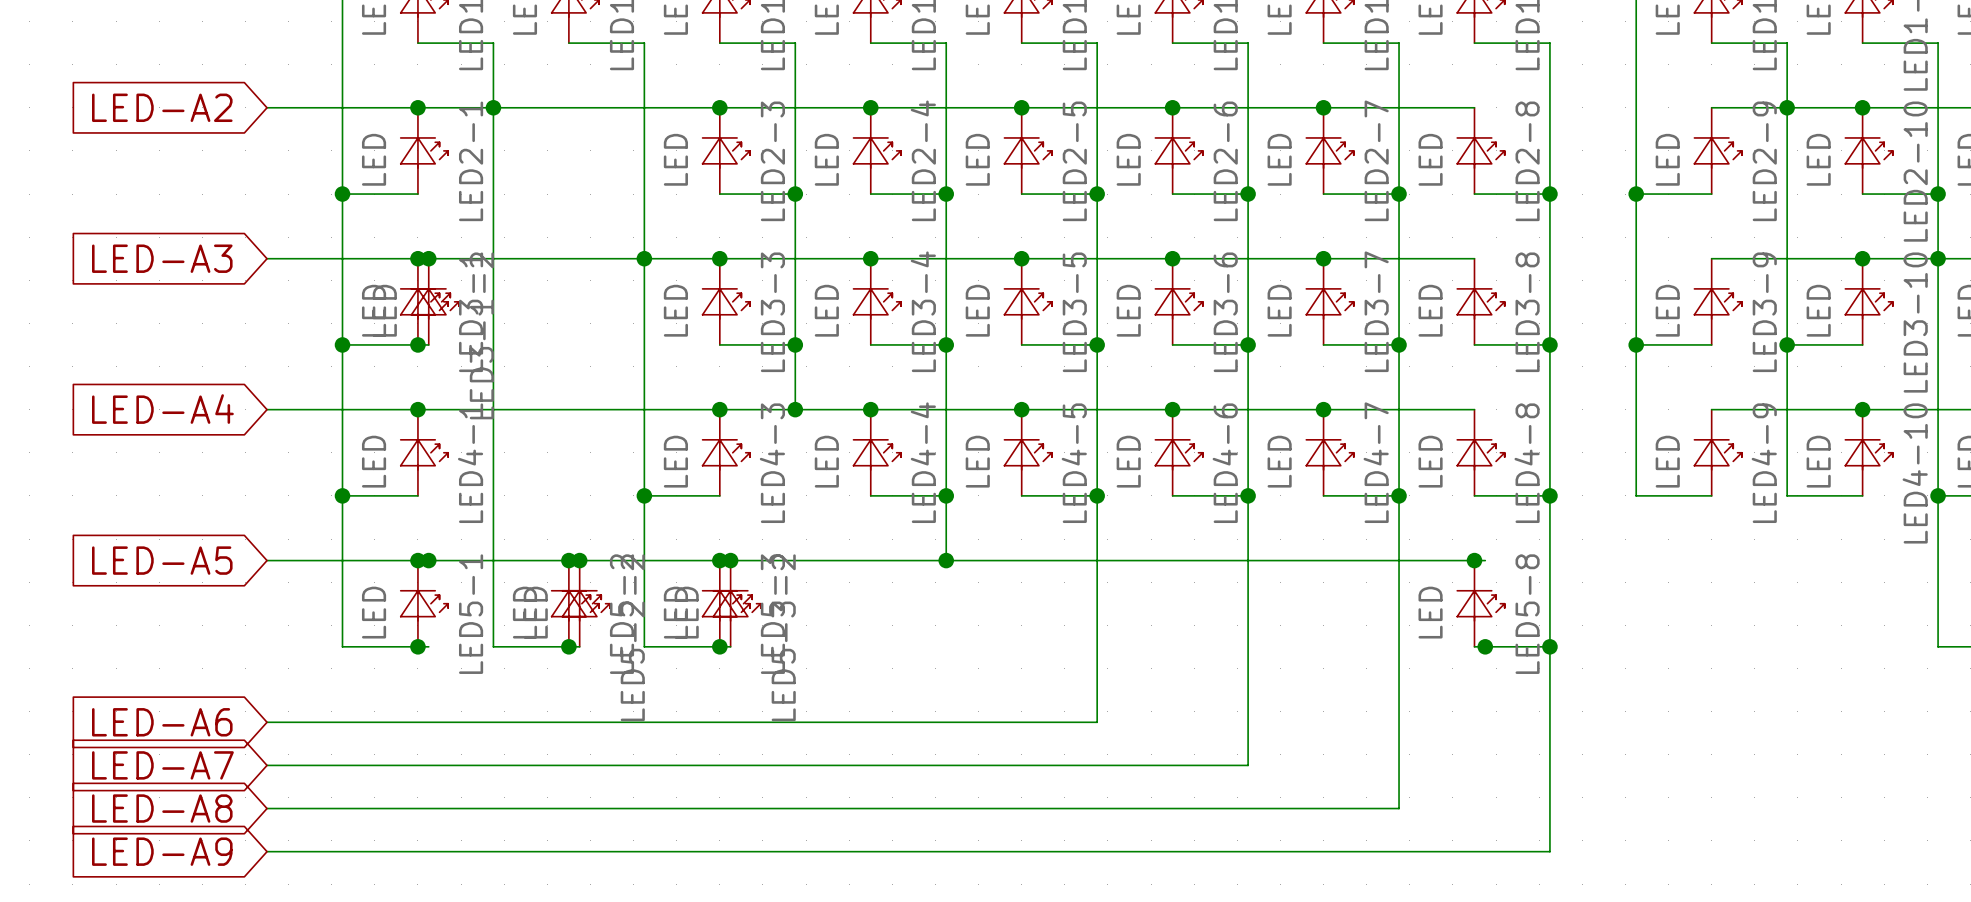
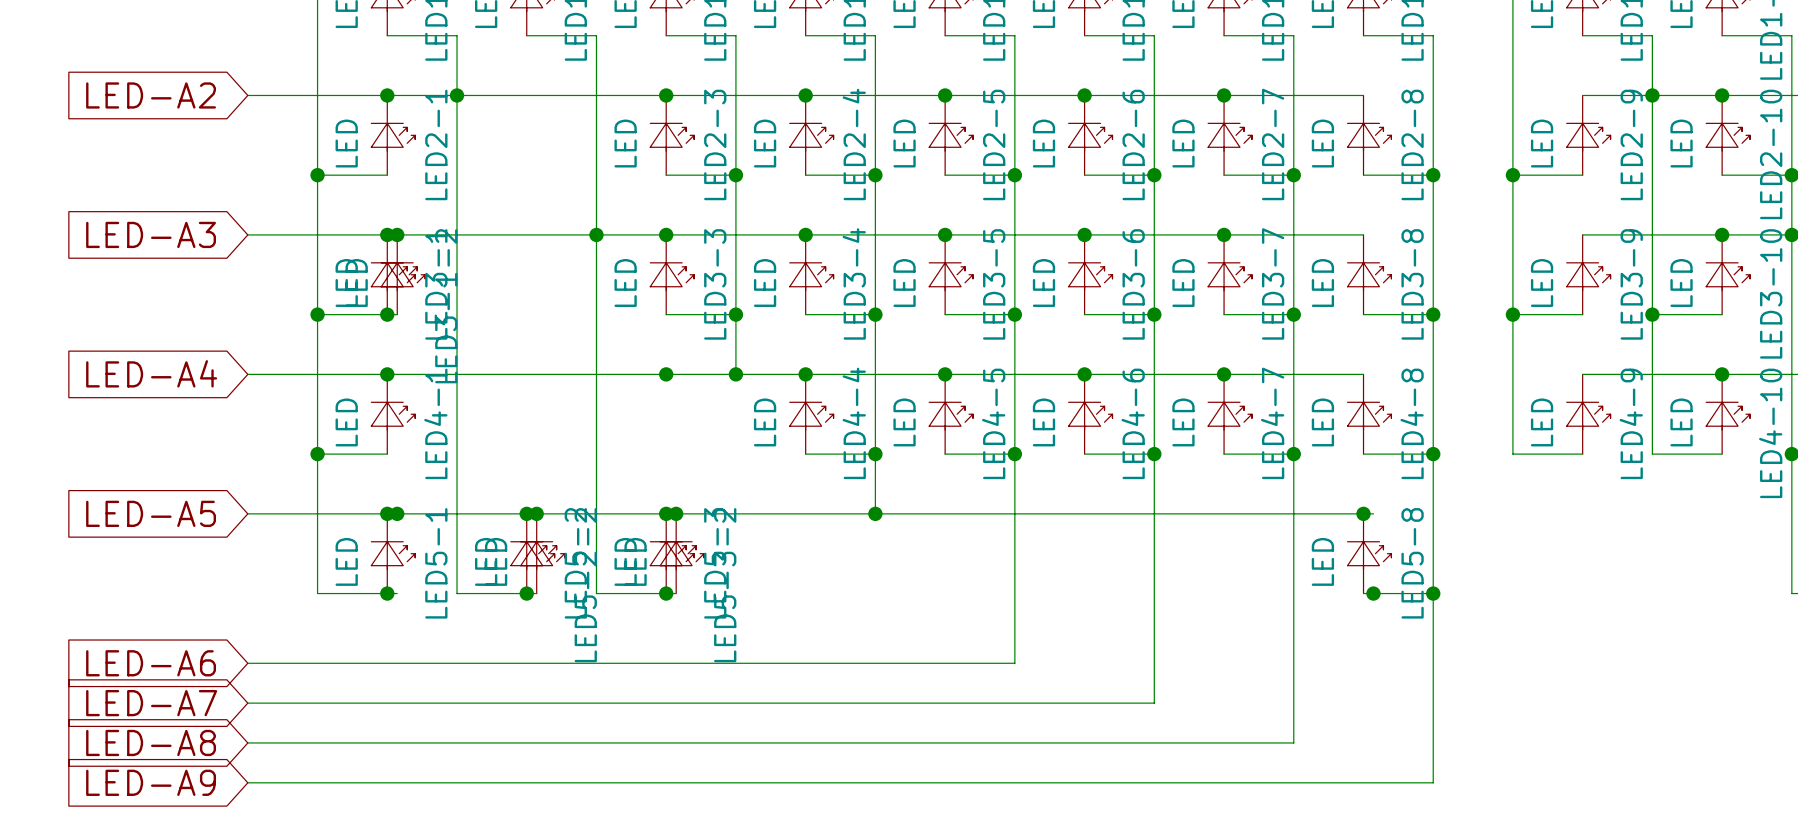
LED4-3: LED (726, 452) -> none
wire: (644, 495) (719, 495) -> none
junction: (644, 495) -> none

